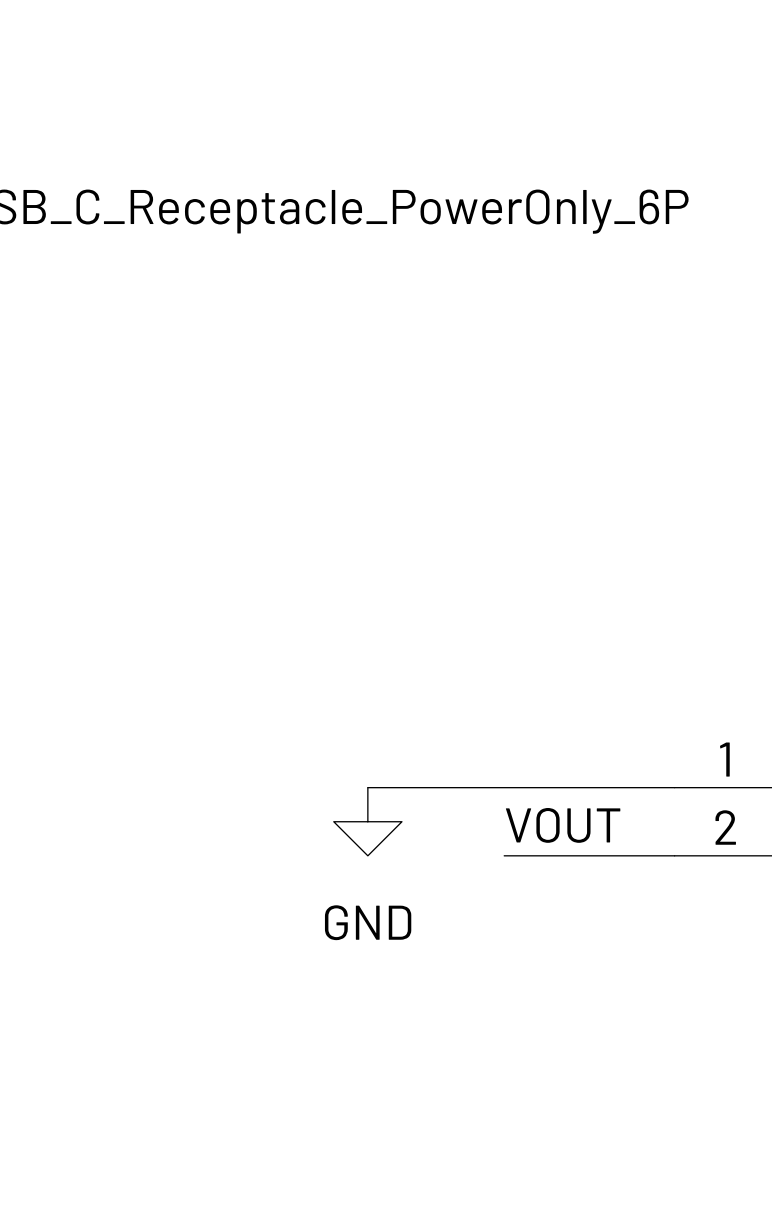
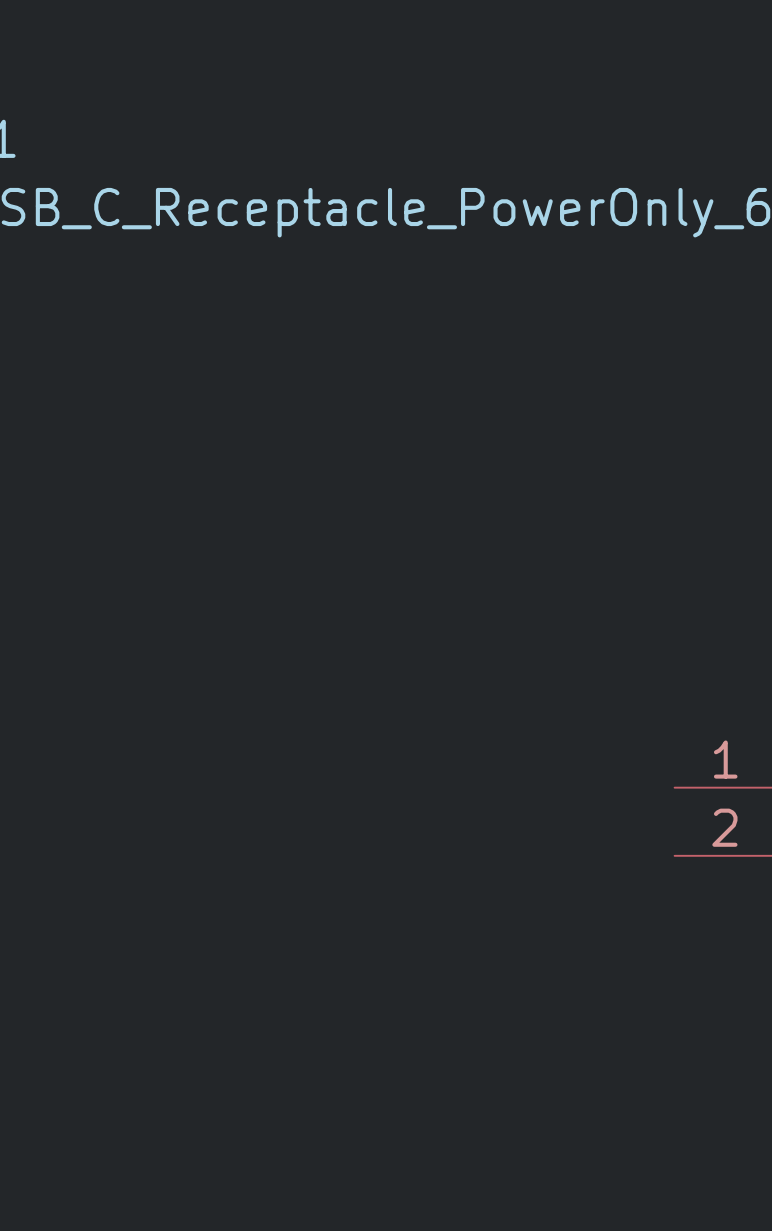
wire: (367, 787) (674, 787) -> none
power symbol: GND (367, 821) -> none
label: VOUT (563, 825) -> none
wire: (504, 855) (674, 855) -> none

